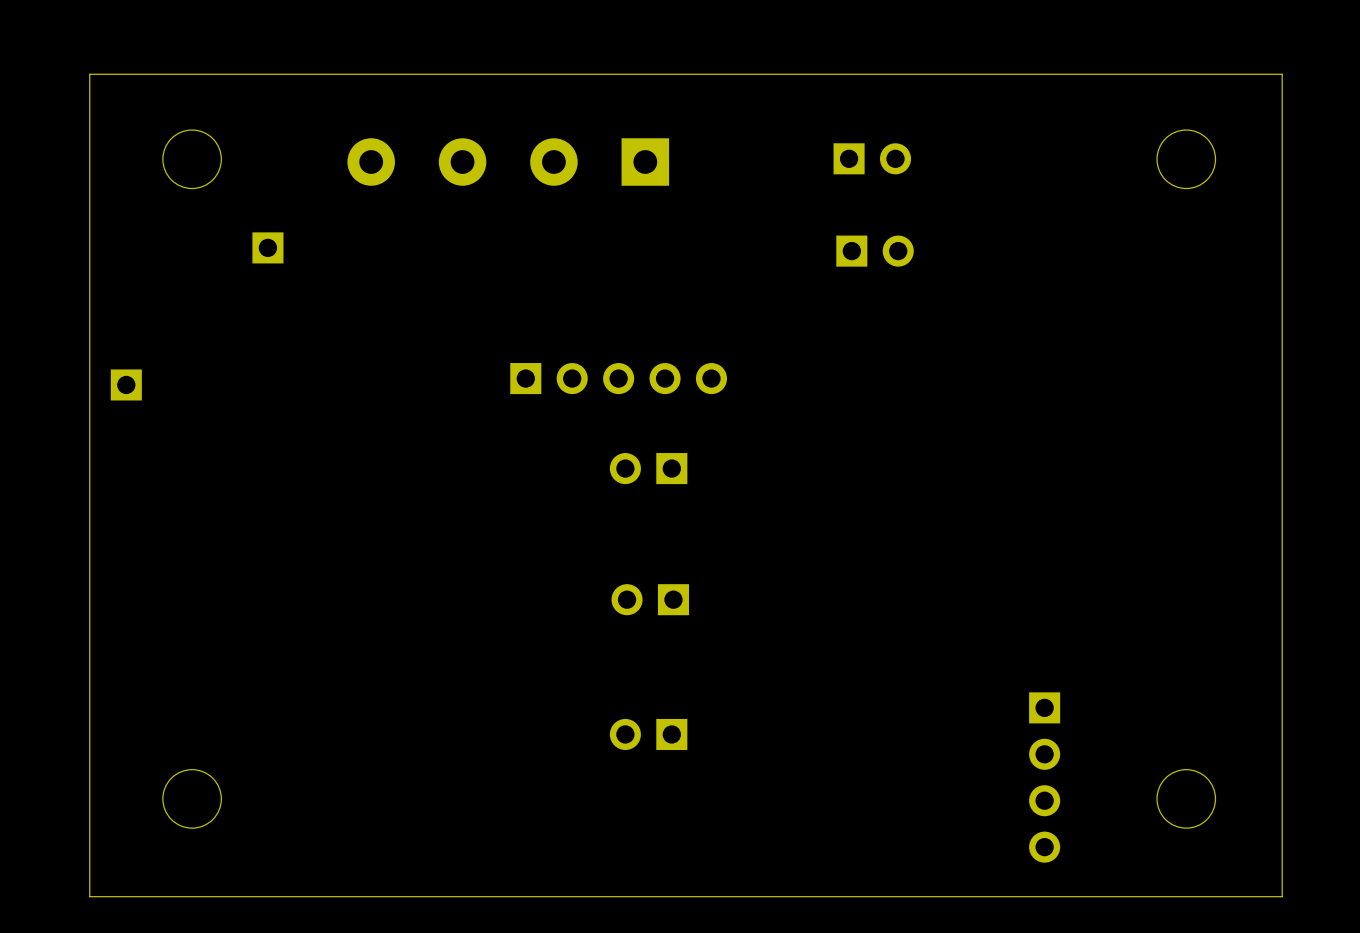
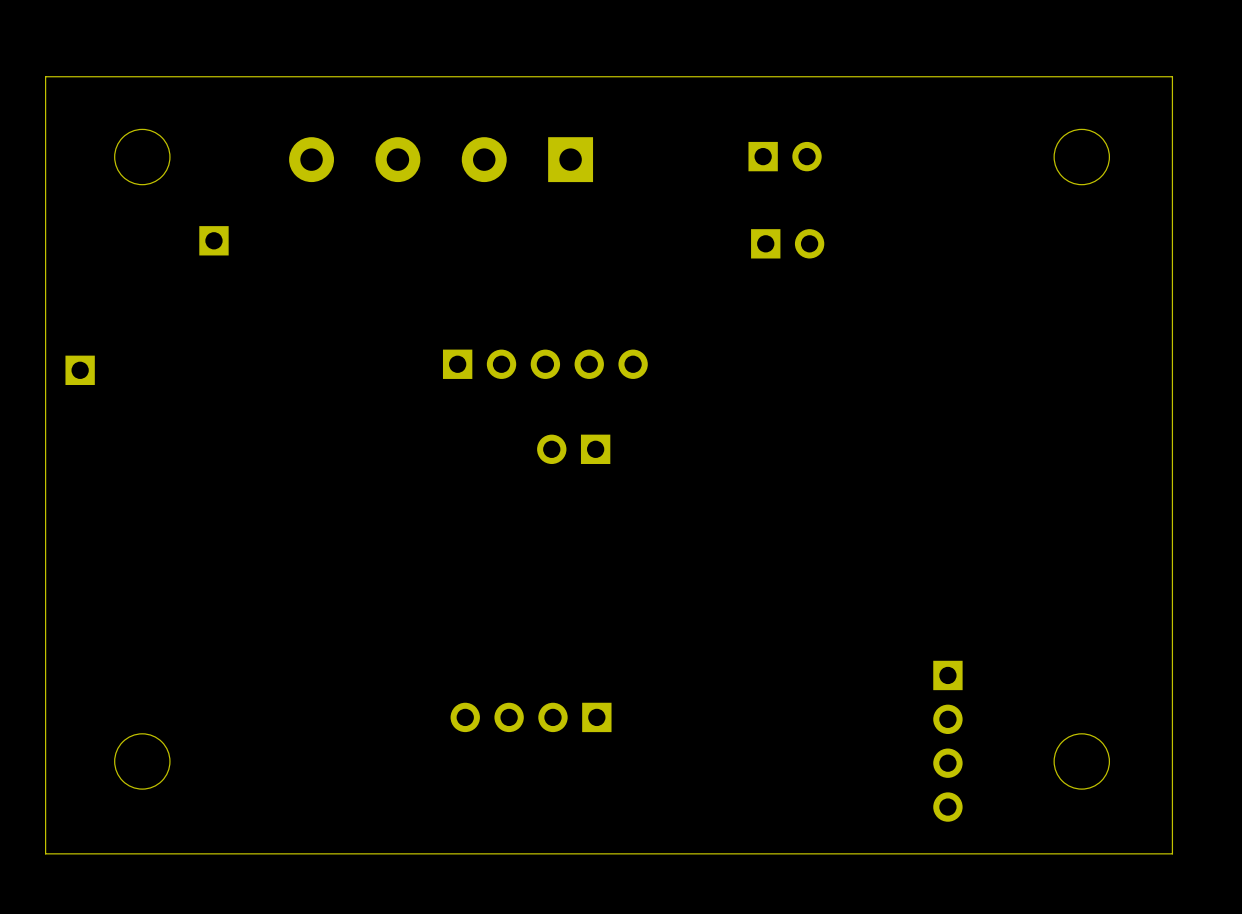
part: (650, 599) -> none
part: (648, 734) -> none
part: none -> (531, 717)

